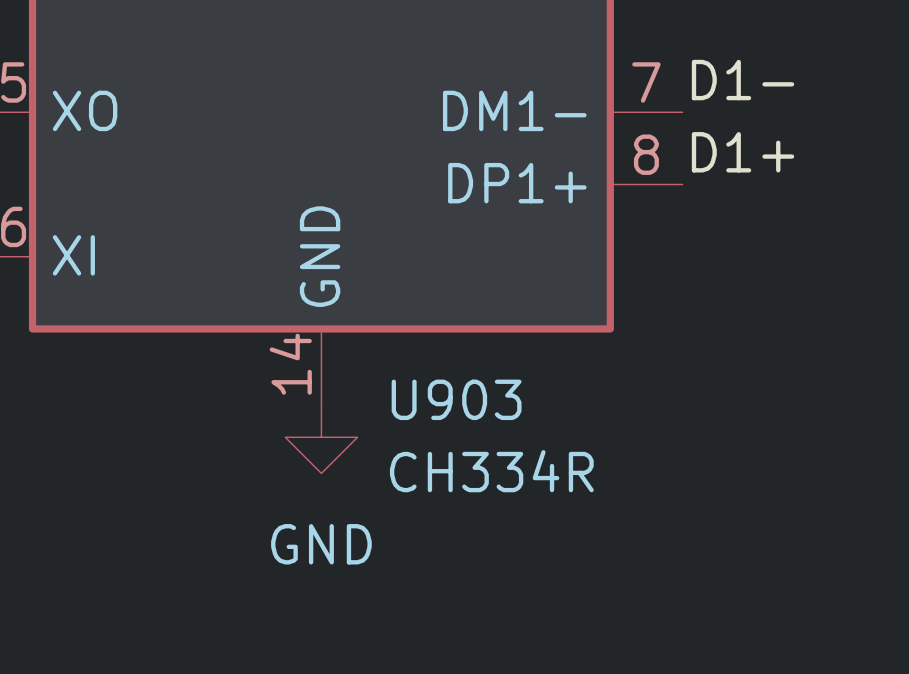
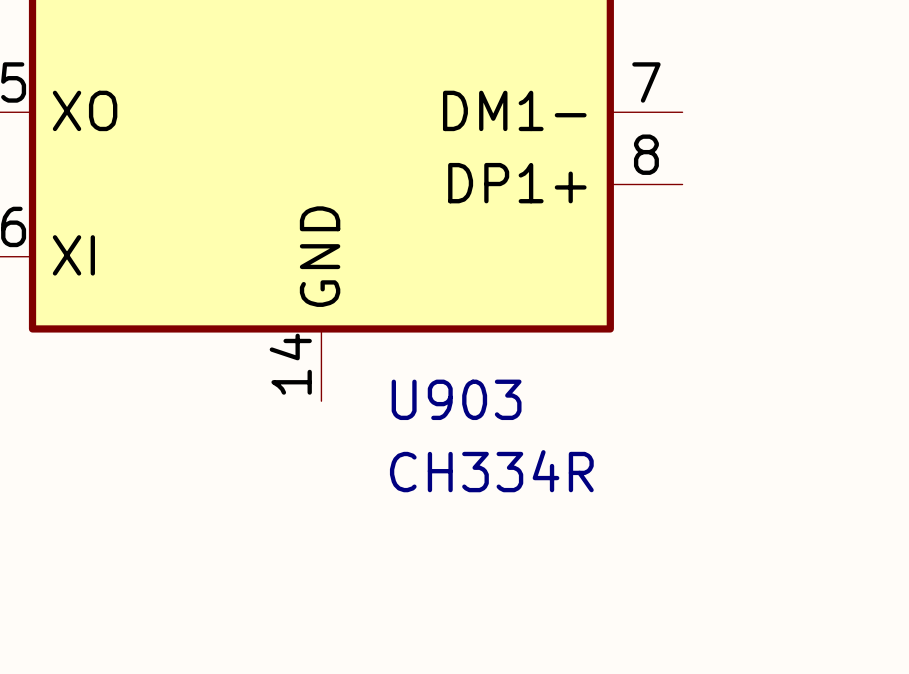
label: D1- (743, 80) -> none
label: D1+ (743, 152) -> none
power symbol: GND (321, 437) -> none

